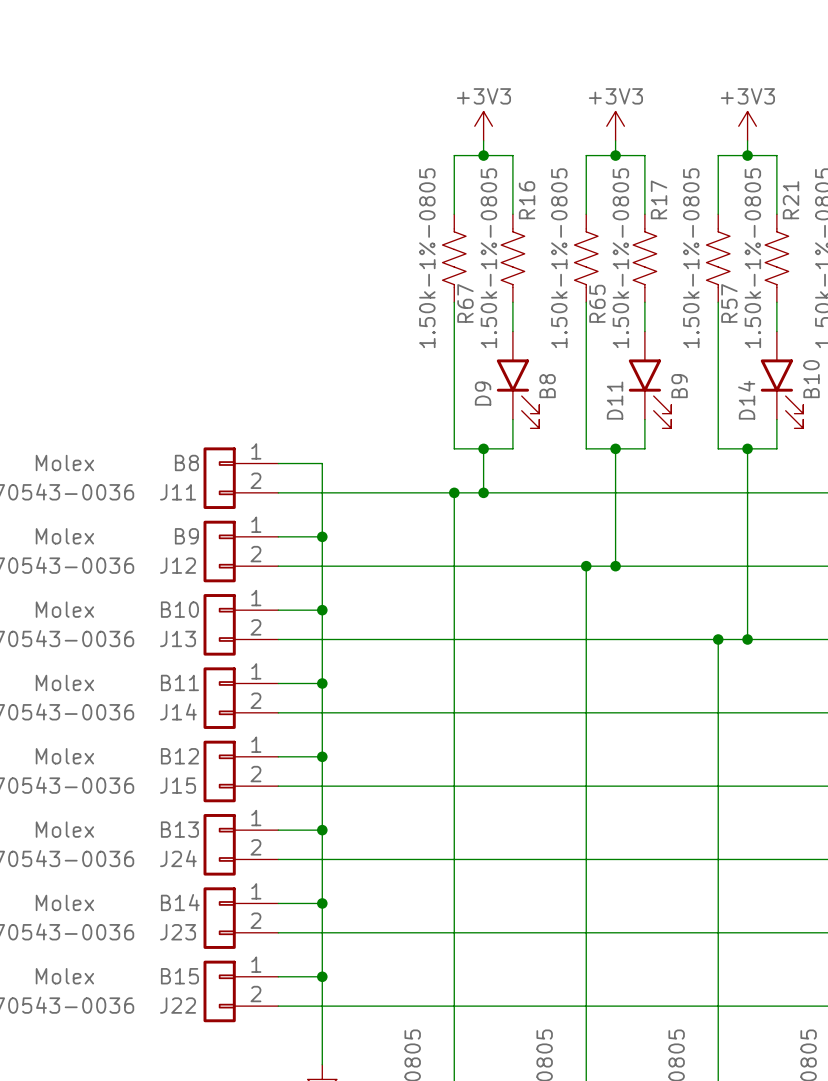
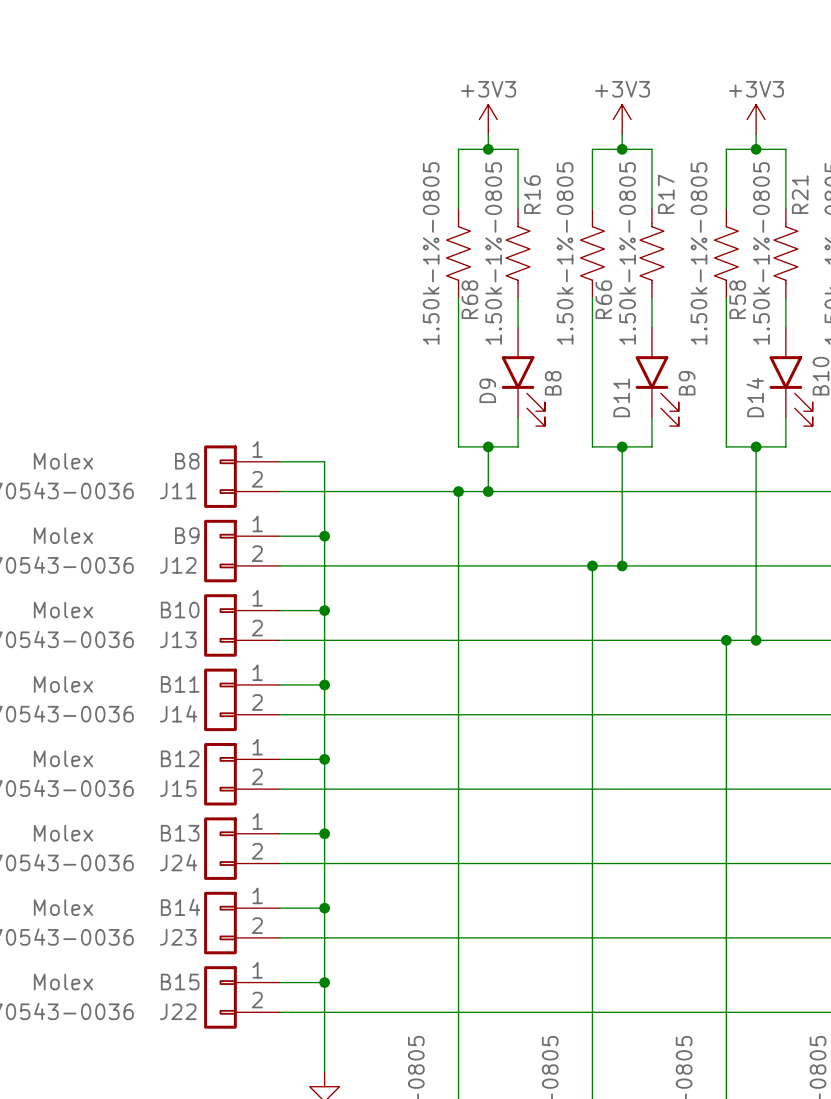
R67 name: R67 (465, 303) -> R68 (469, 299)
R65 name: R65 (597, 303) -> R66 (603, 299)
R57 name: R57 (729, 303) -> R58 (737, 299)

